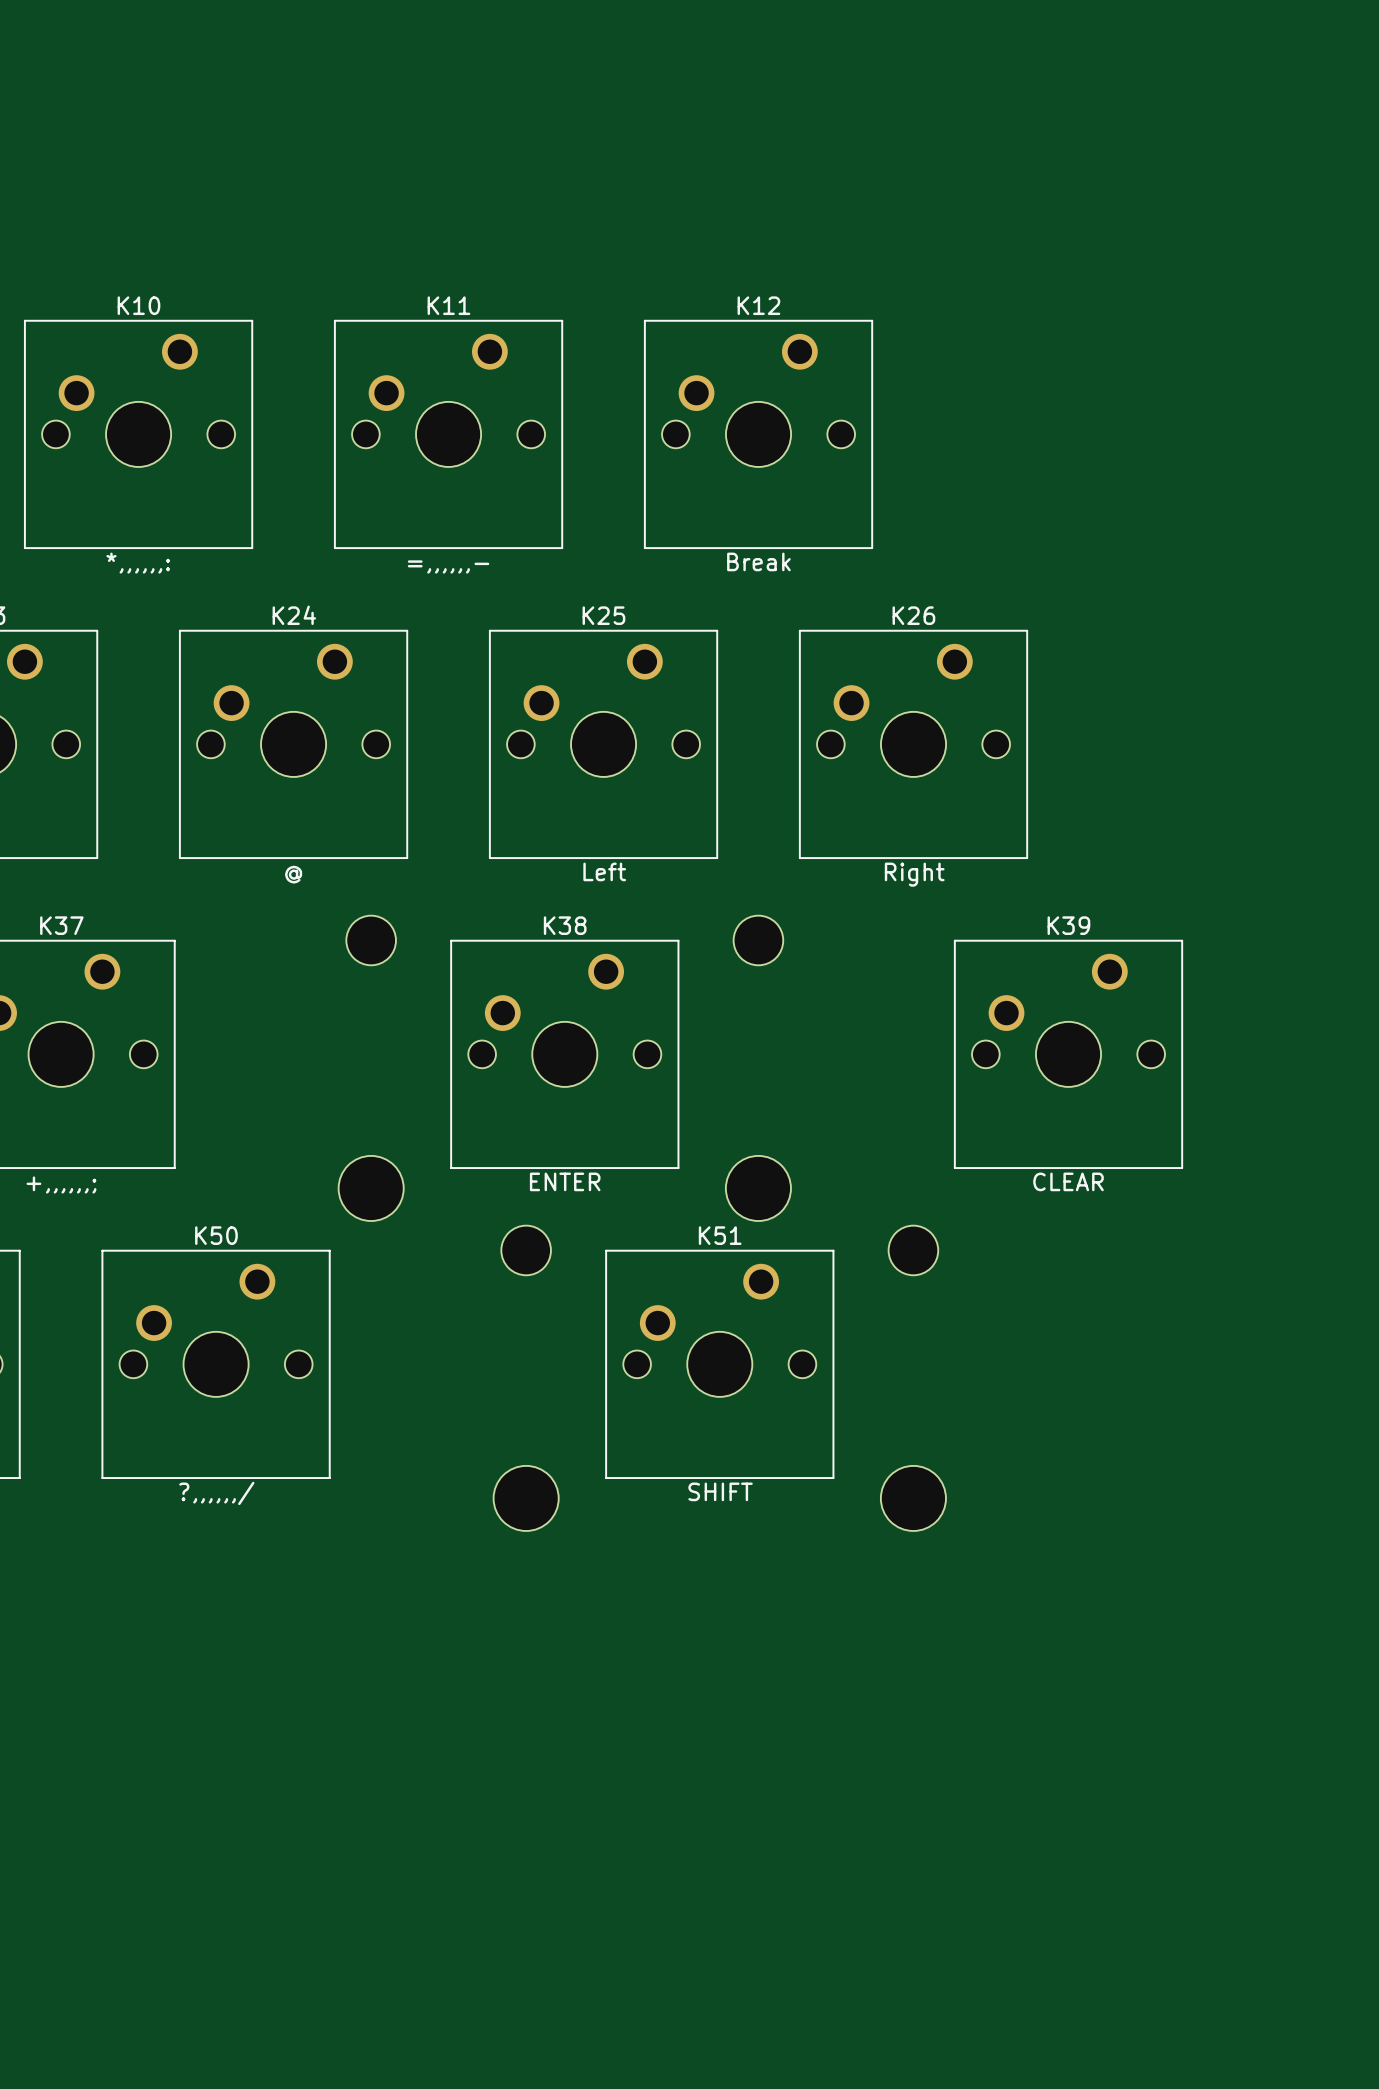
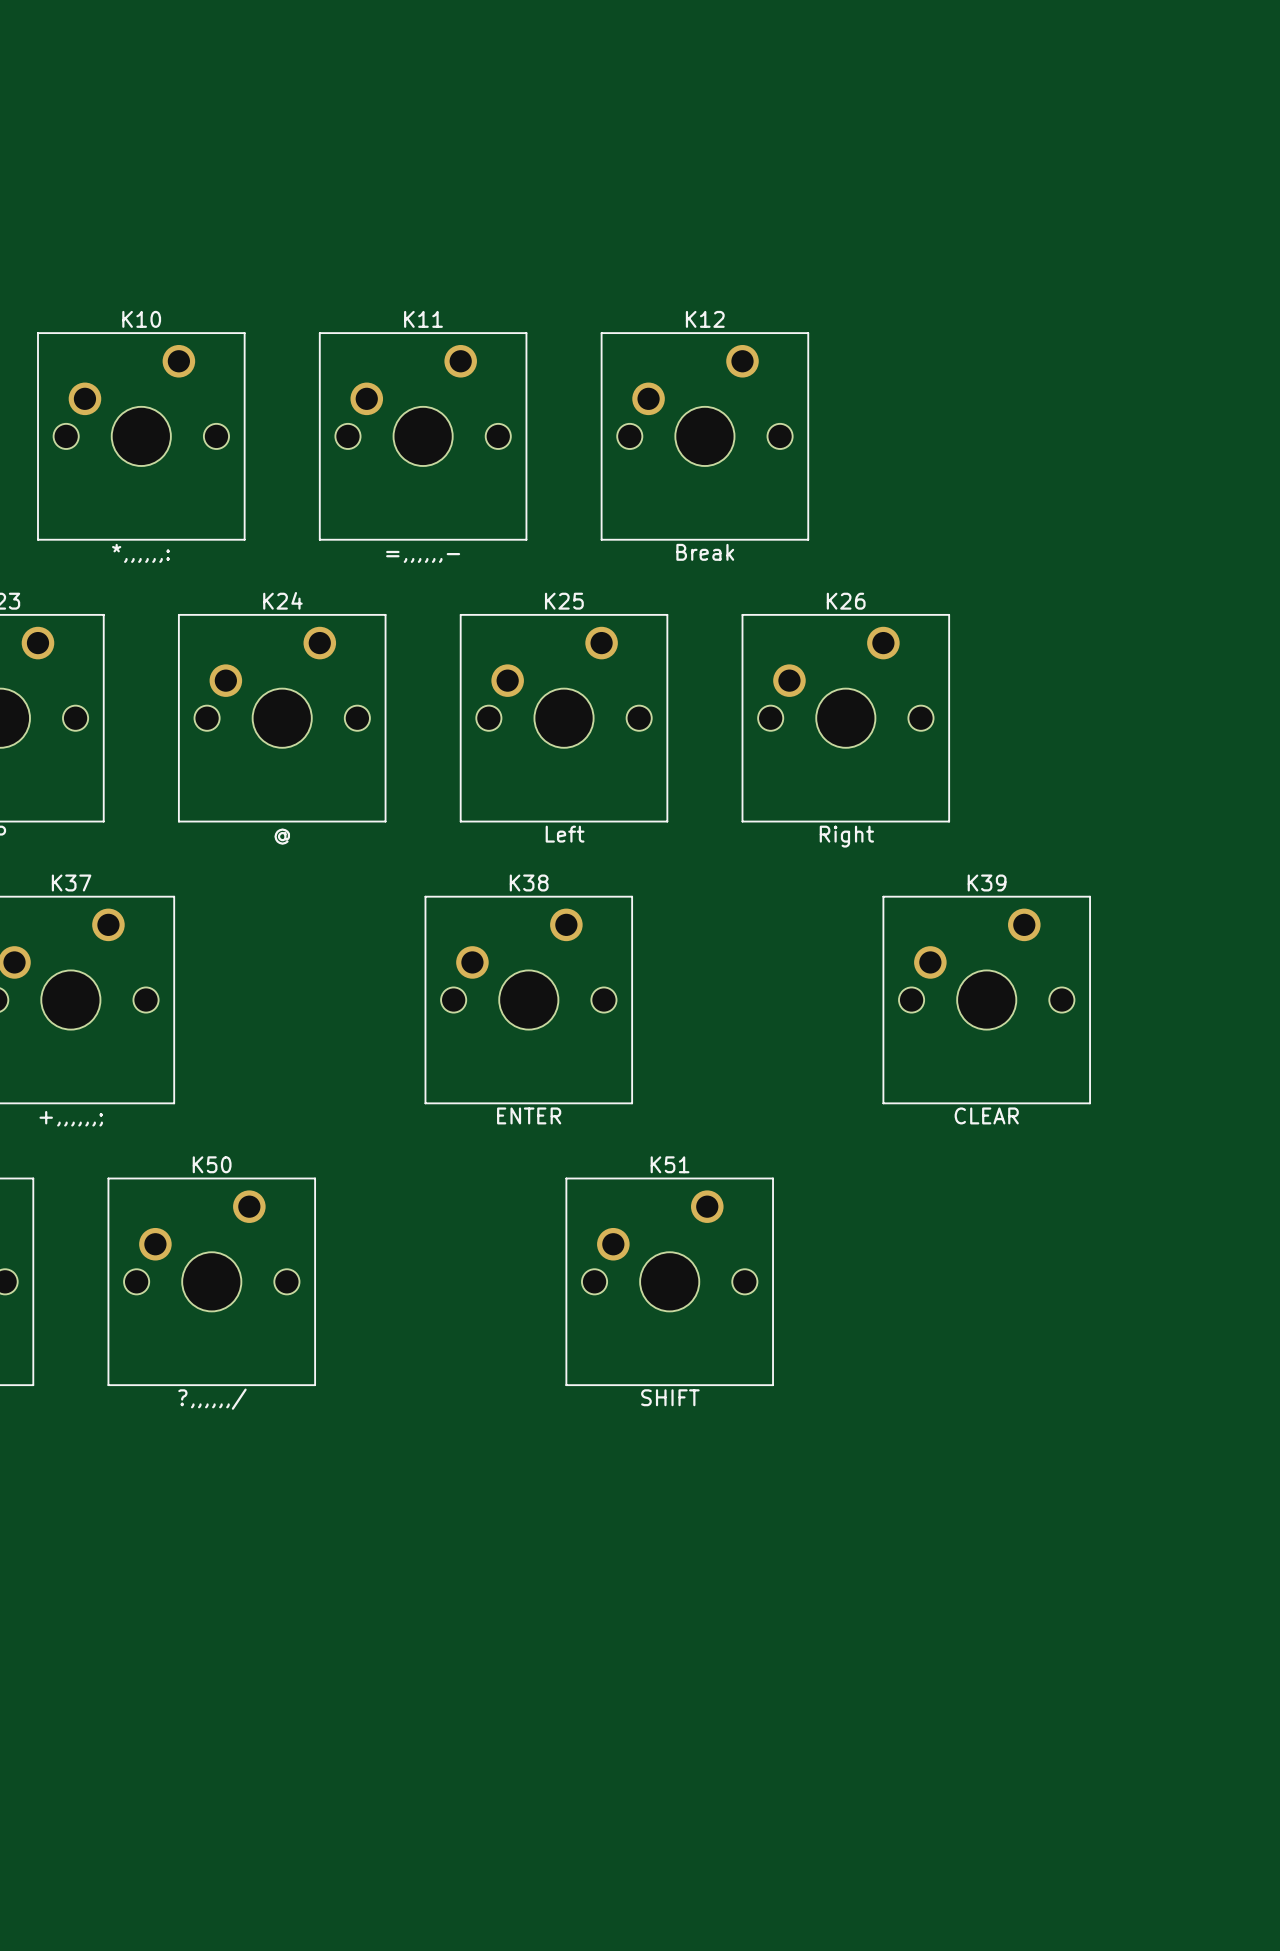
K38 footprint: [338, 915, 791, 1222] -> [424, 895, 634, 1105]
K51 footprint: [493, 1225, 946, 1531] -> [565, 1177, 774, 1387]

